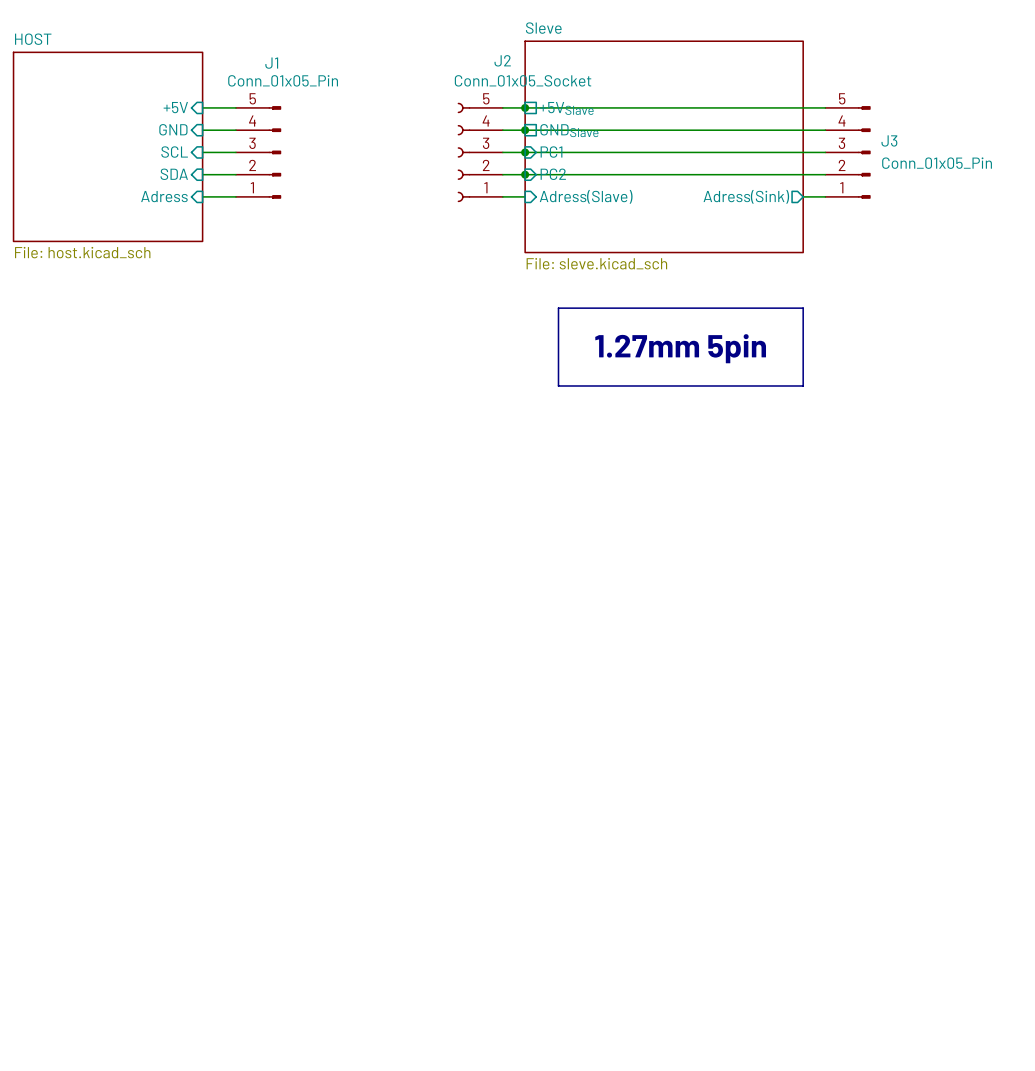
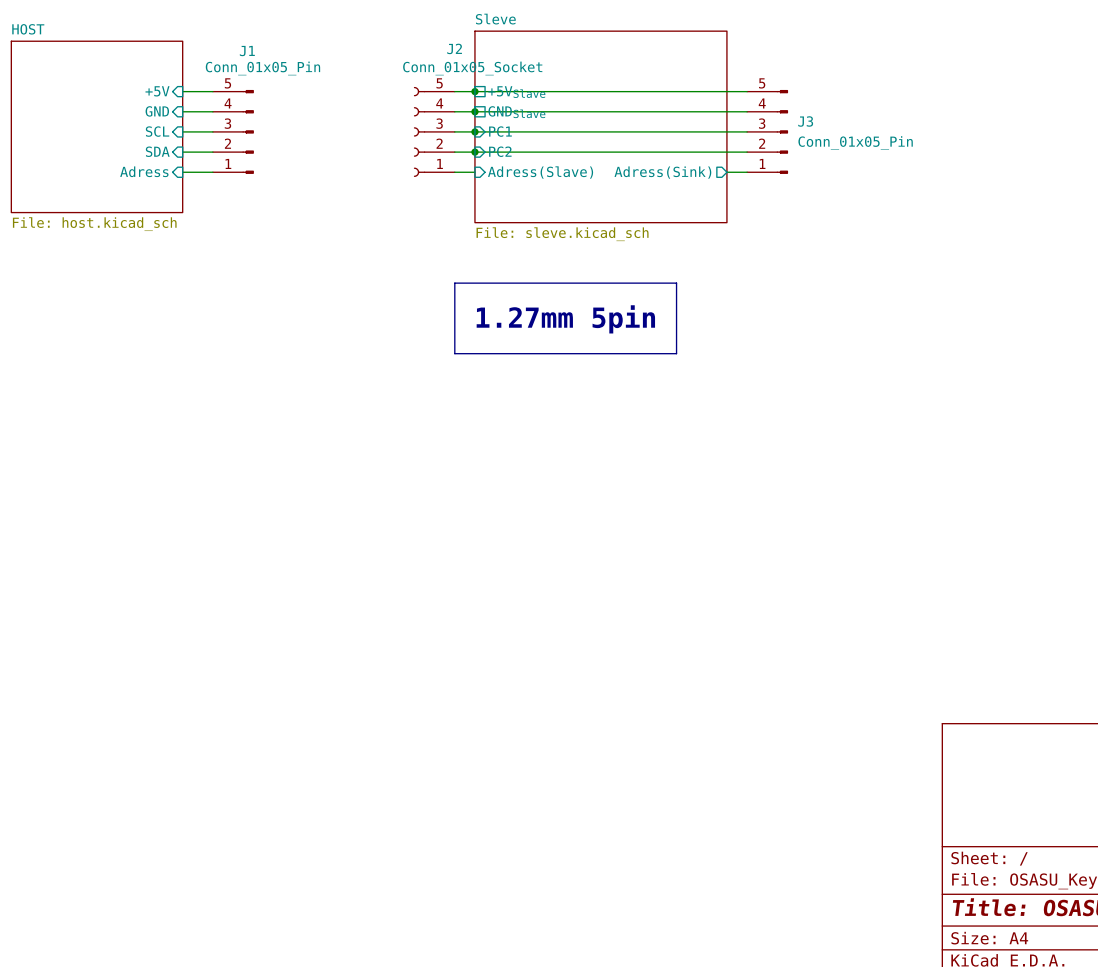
line: (558, 308) (803, 308) (803, 385) (558, 385) (558, 308) -> (454, 283) (676, 283) (676, 353) (454, 353) (454, 283)
text position: 1.27mm 5pin (680, 348) -> 1.27mm 5pin (565, 319)

